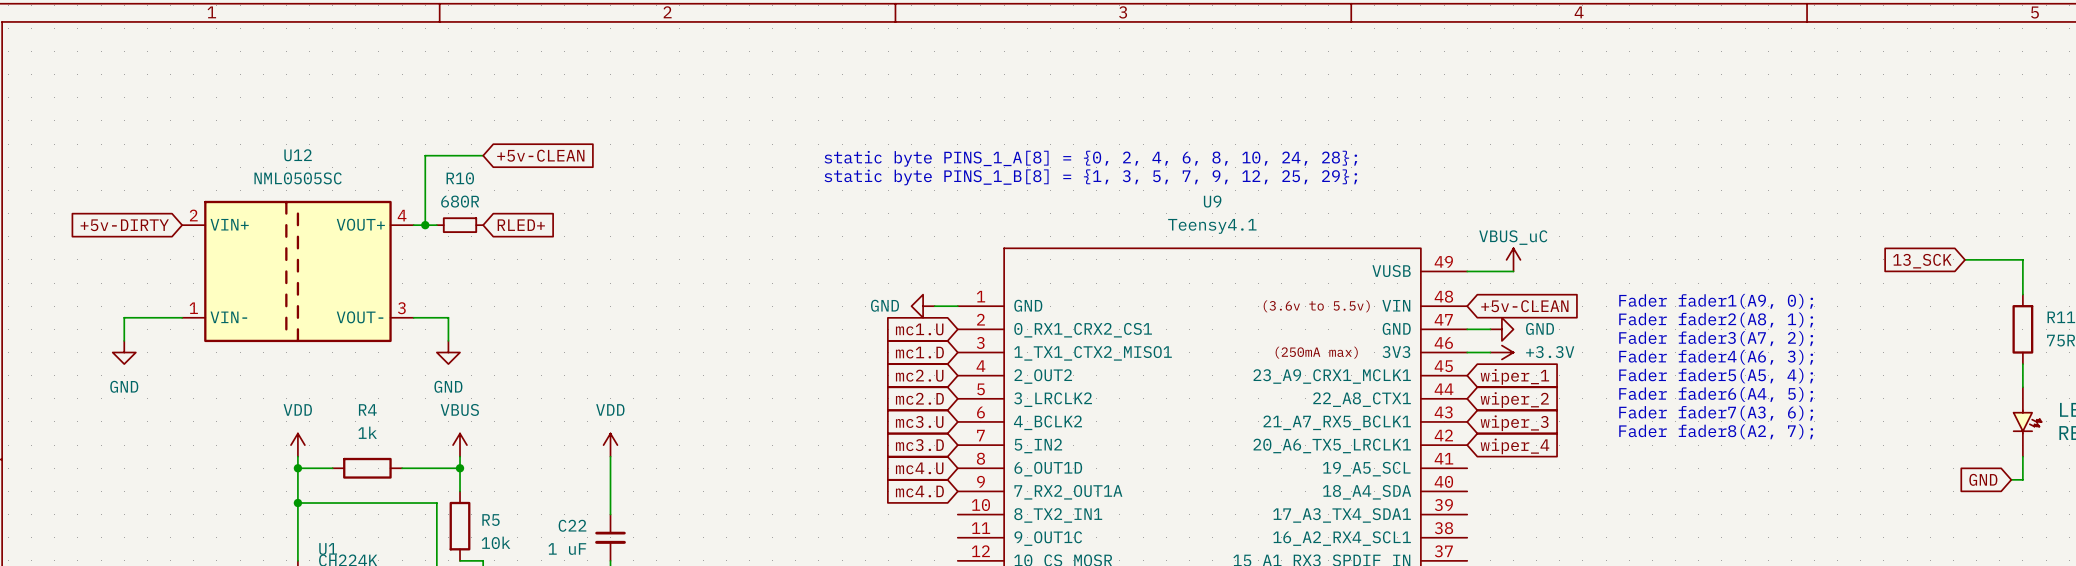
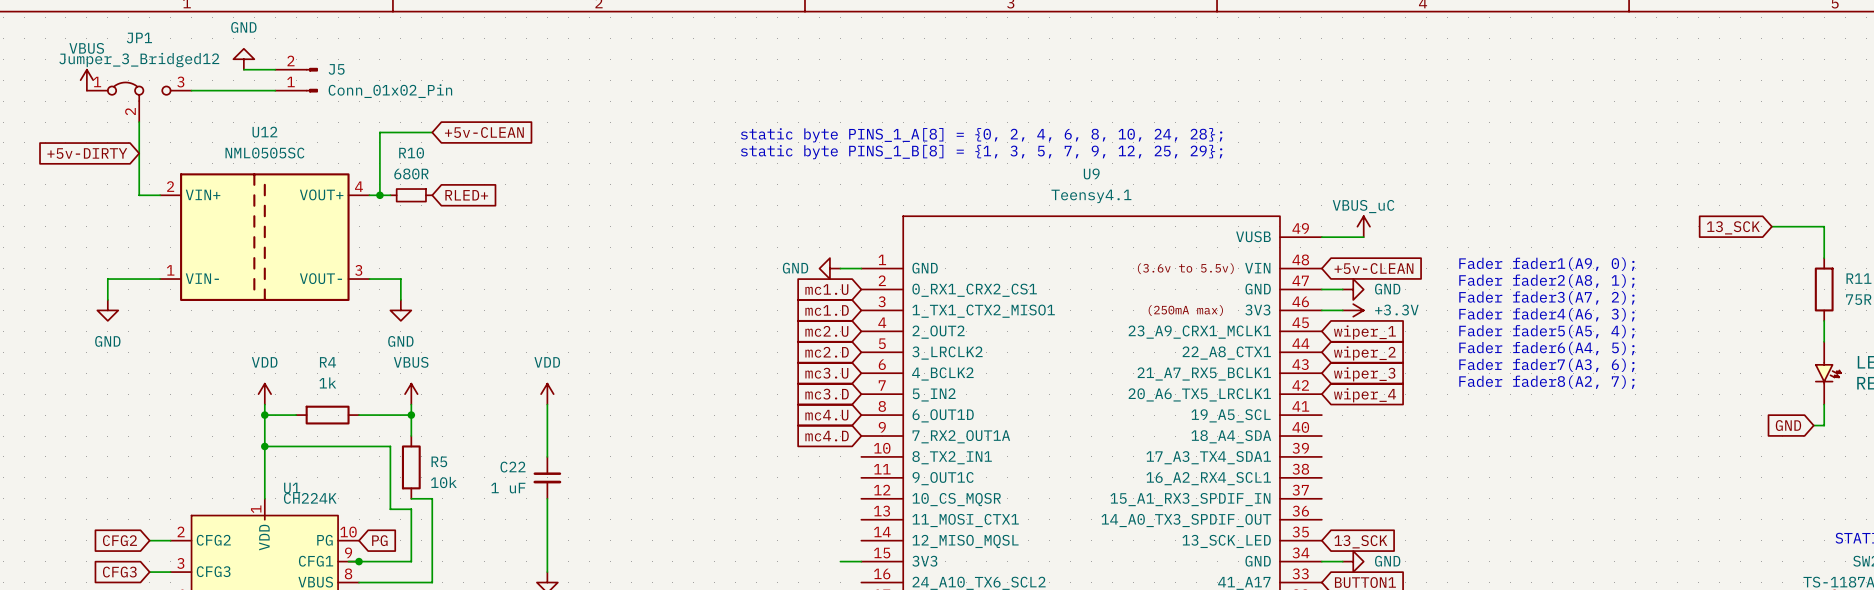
power symbol: none -> GND (243, 59)
wire: none -> (243, 69) (275, 69)
power symbol: none -> VBUS (86, 80)
J5: none -> Conn_01x02_Pin (296, 80)
wire: none -> (191, 90) (275, 90)
JP1: none -> Jumper_3_Bridged12 (139, 102)
wire: none -> (139, 122) (139, 195) (160, 195)
global label position: +5v-DIRTY (124, 225) -> +5v-DIRTY (87, 153)

